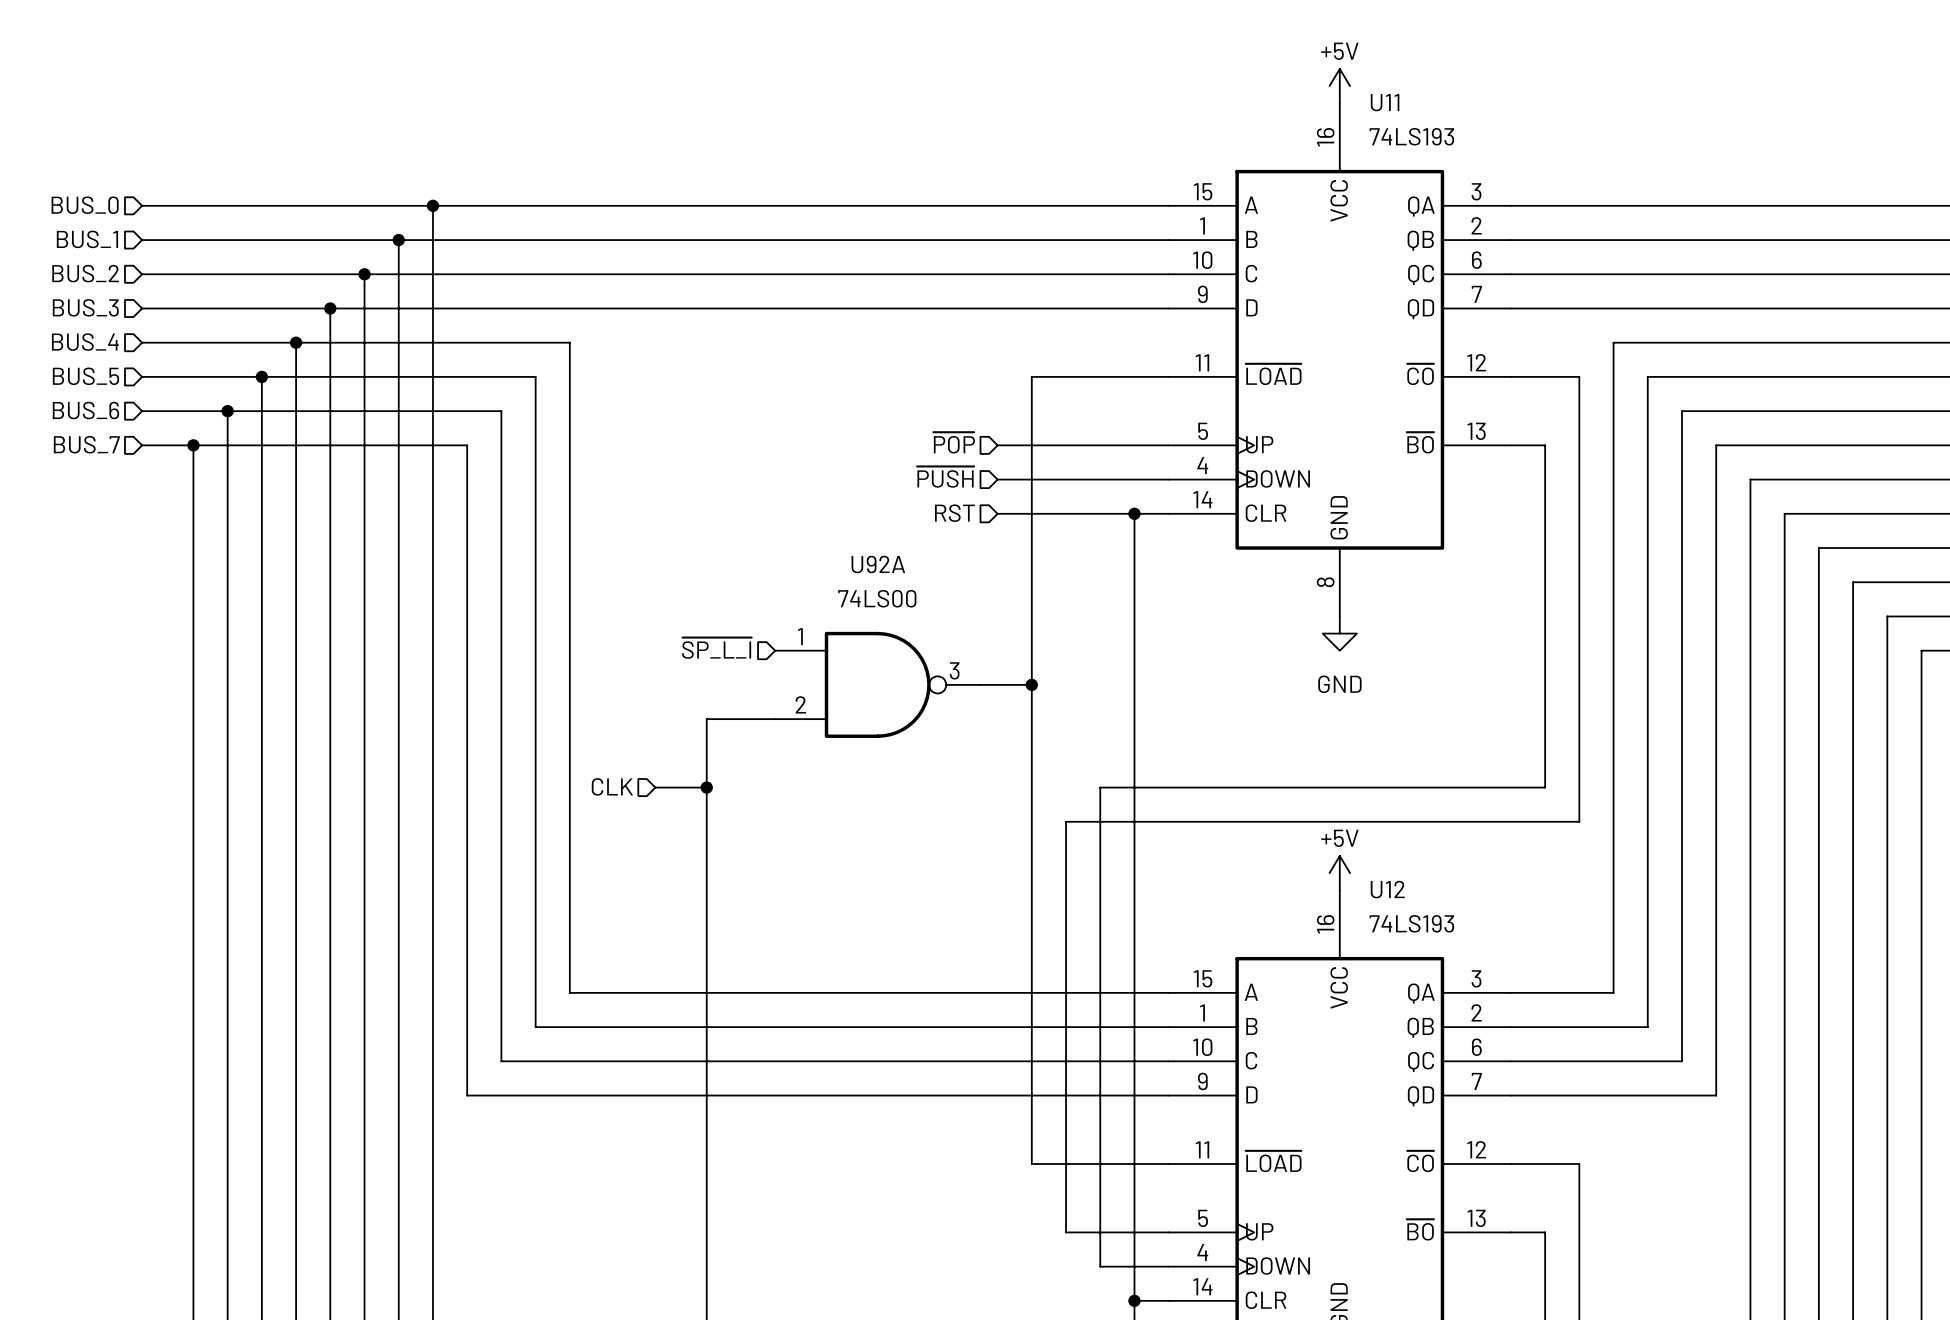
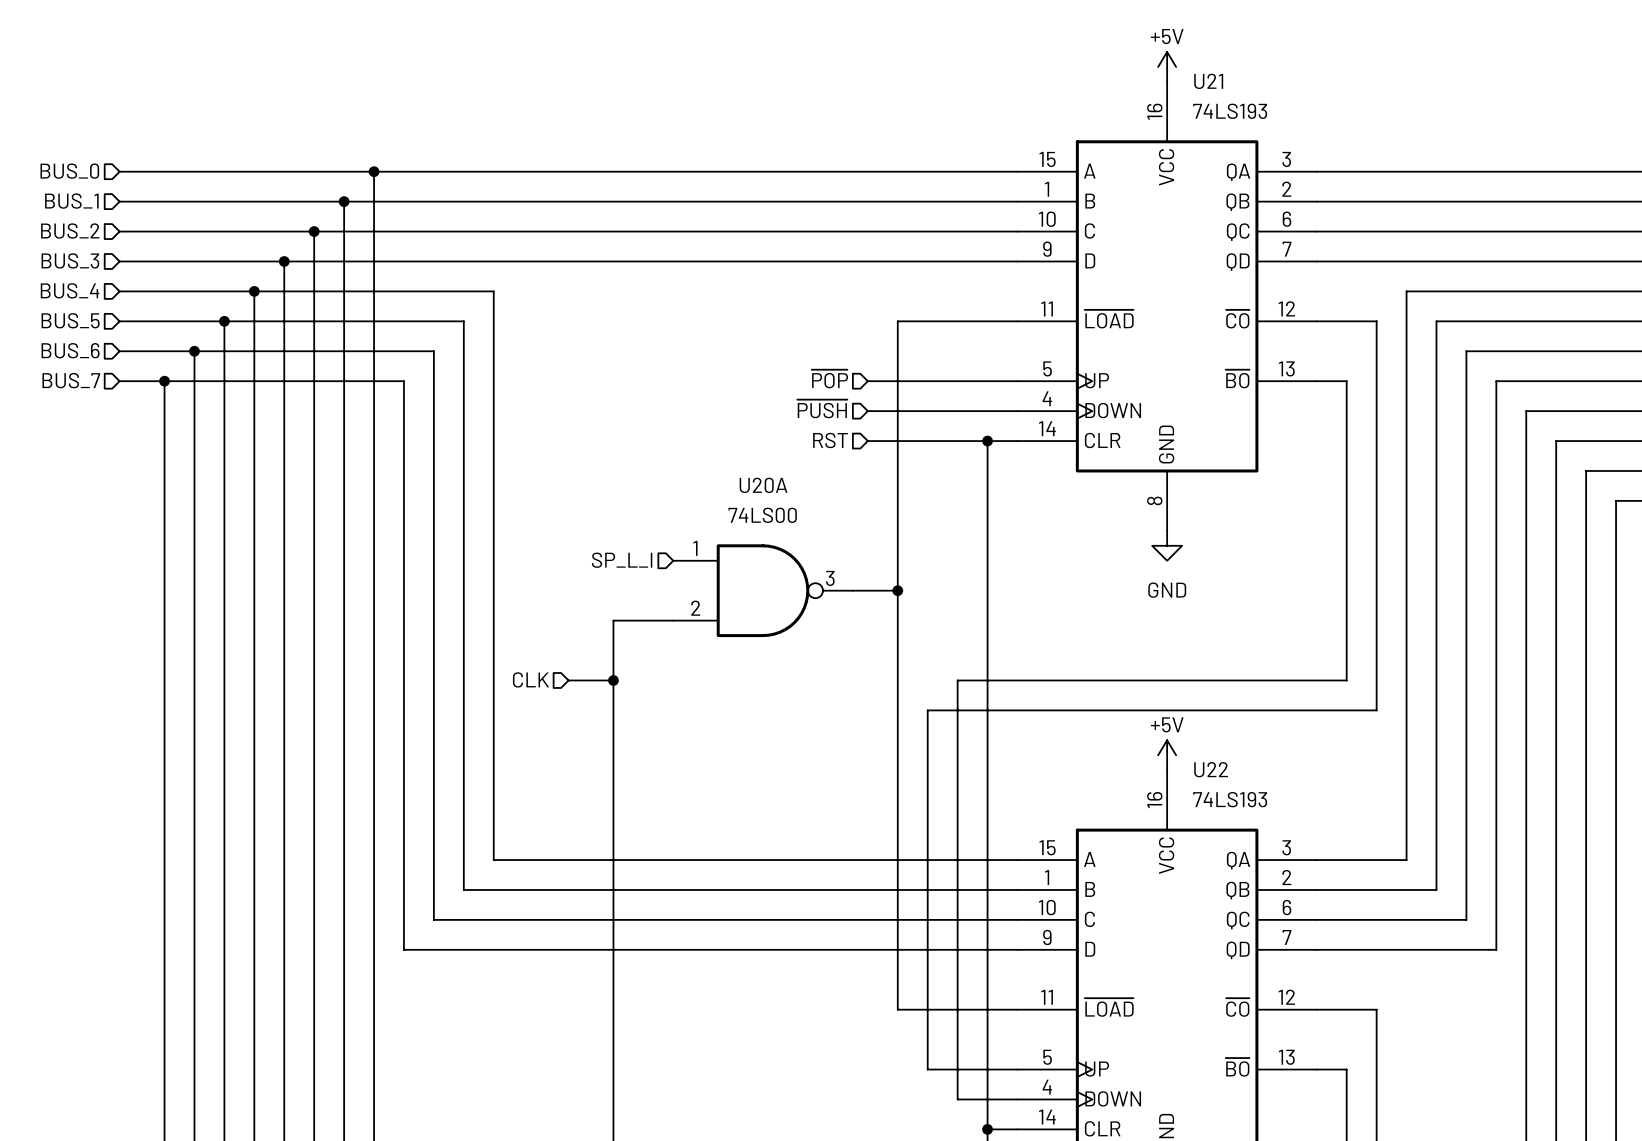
U11 name: U11 (1385, 102) -> U21 (1208, 81)
U92A name: U92A (878, 564) -> U20A (763, 485)
hierarchical label: ~{SP_L_I} (716, 648) -> SP_L_I (622, 560)
U12 name: U12 (1387, 889) -> U22 (1211, 769)

